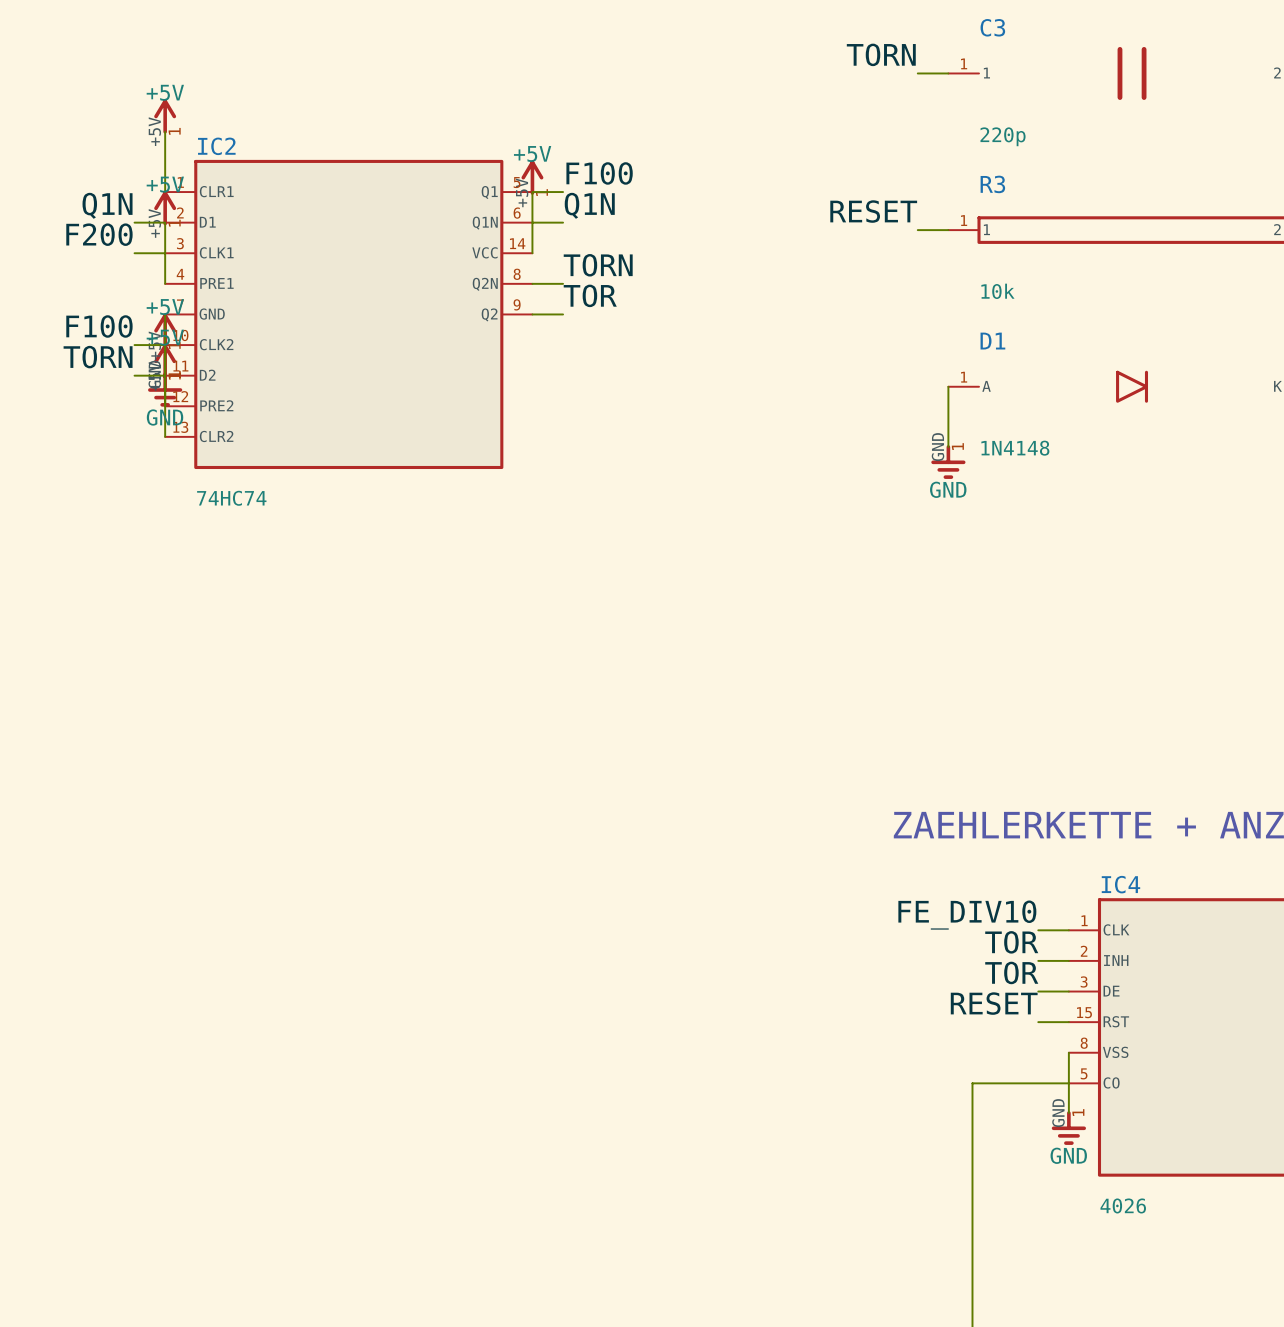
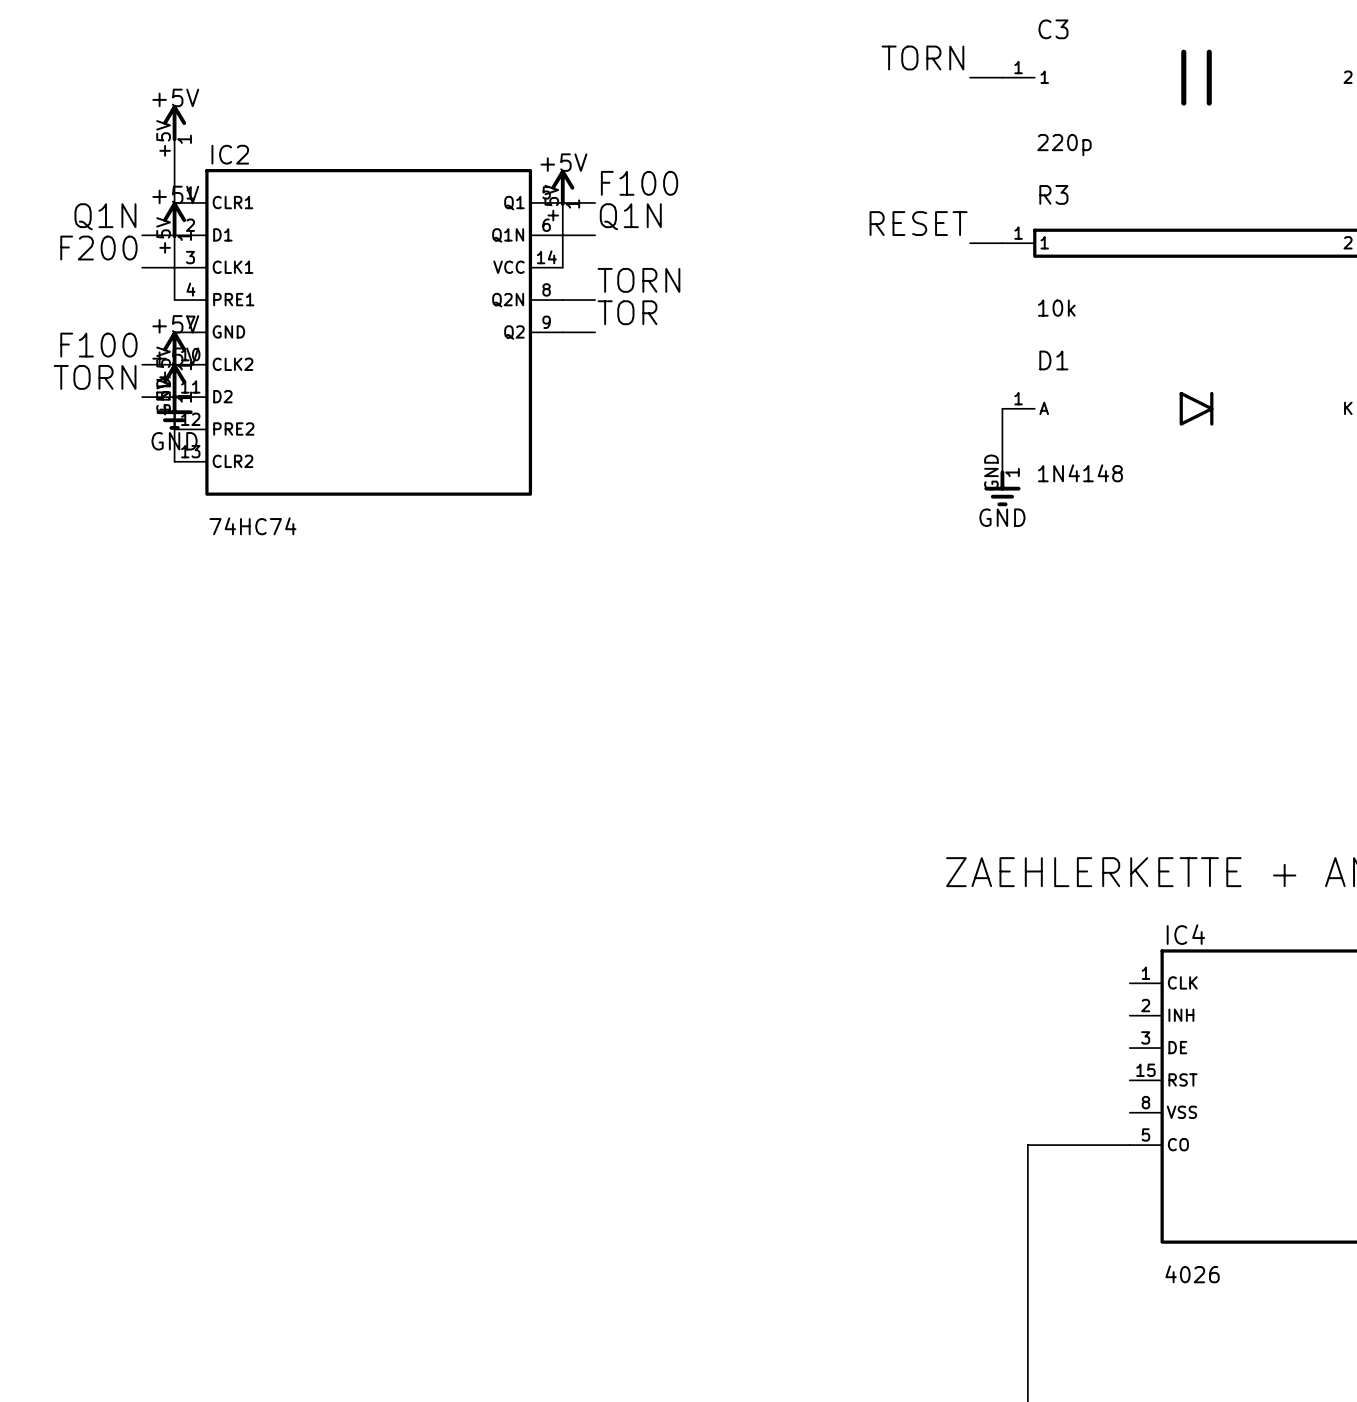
label: FE_DIV10 (967, 915) -> none
wire: (1038, 930) (1068, 930) -> none
label: TOR (1011, 942) -> none
wire: (1038, 960) (1068, 960) -> none
label: TOR (1011, 972) -> none
wire: (1038, 991) (1068, 991) -> none
label: RESET (994, 1003) -> none
wire: (1038, 1022) (1068, 1022) -> none
wire: (1068, 1052) (1068, 1112) -> none
power symbol: GND (1068, 1128) -> none

